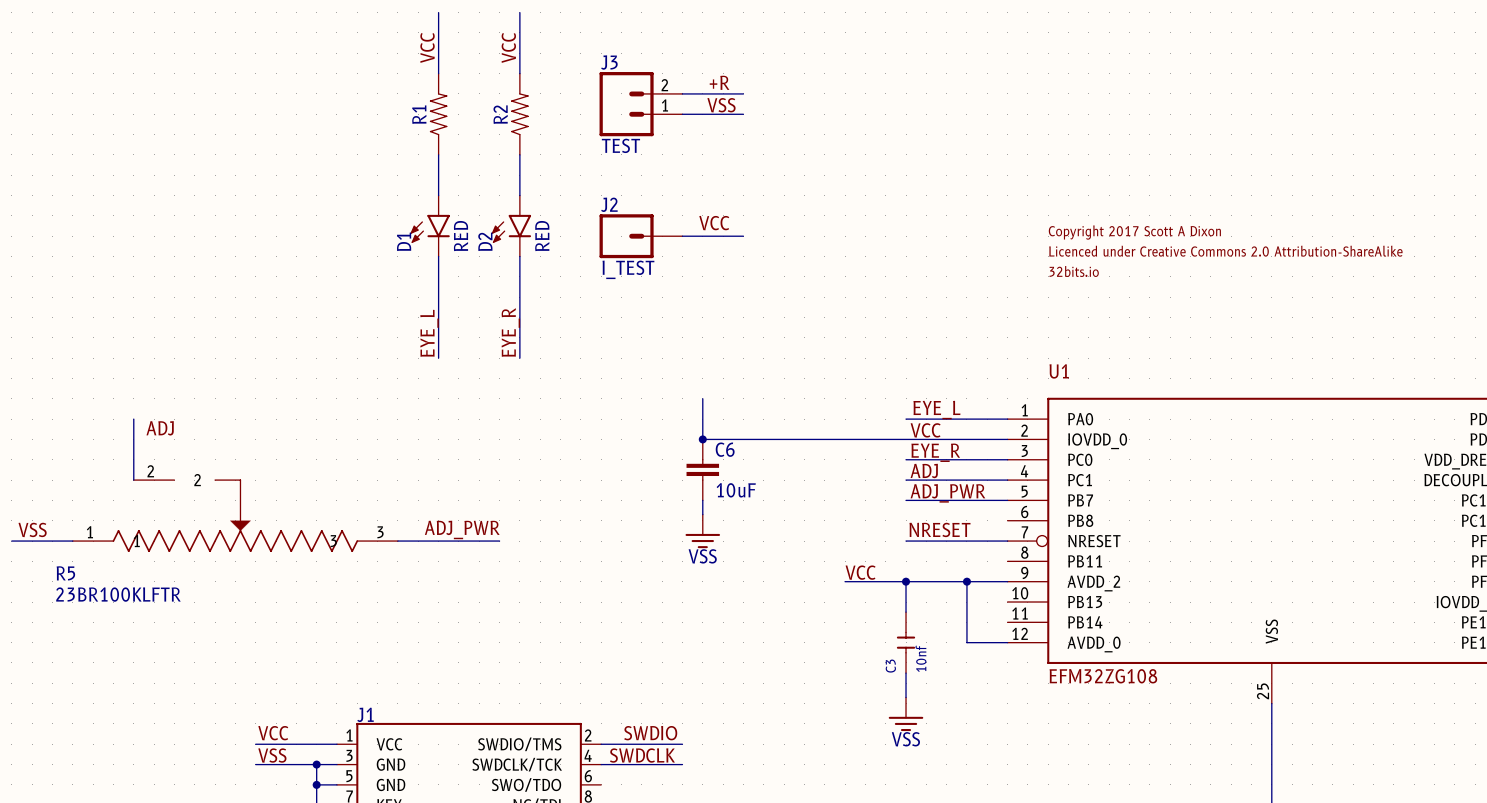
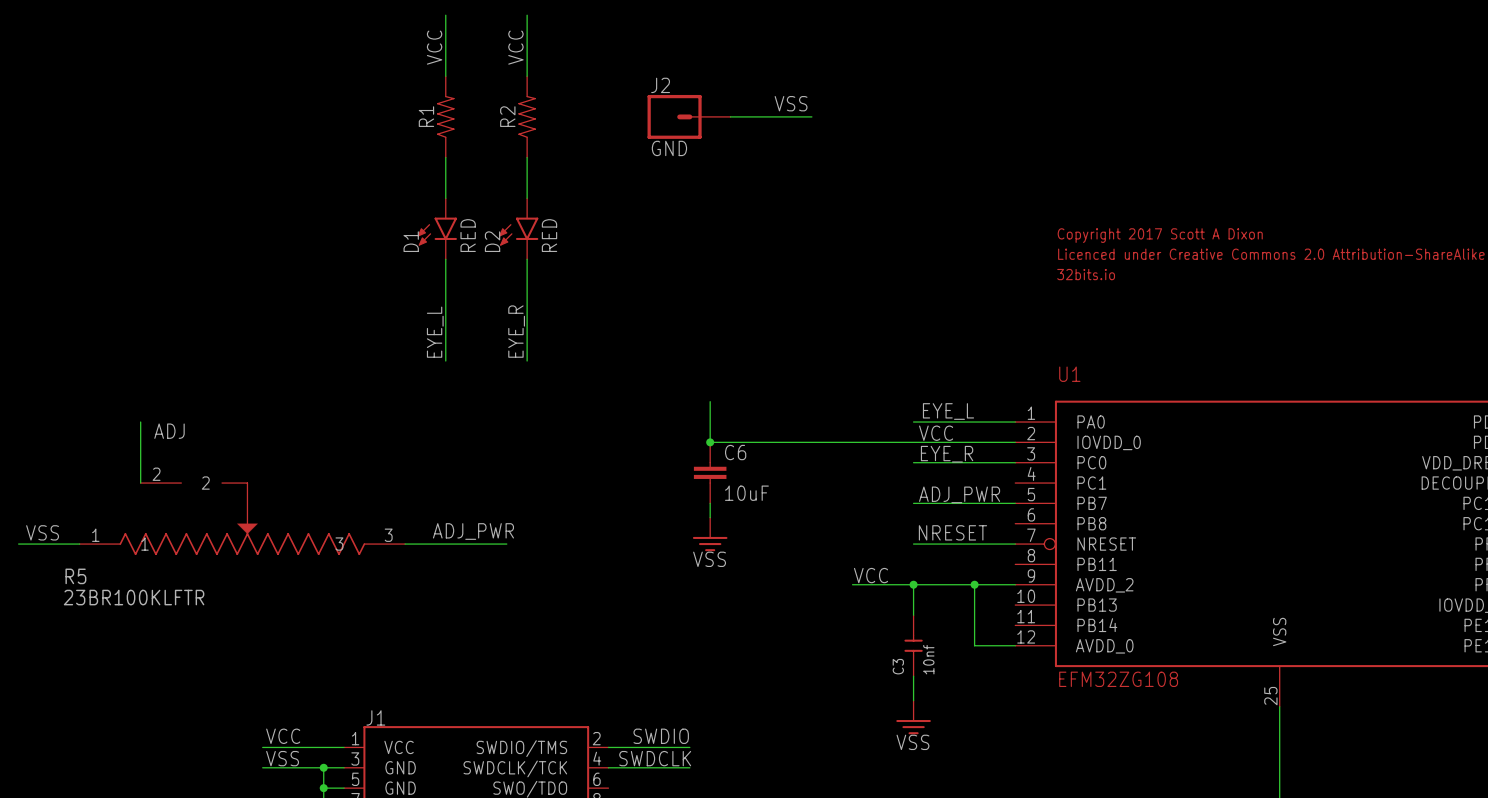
label: +R (719, 82) -> none
wire: (682, 93) (743, 93) -> (750, 116) (811, 116)
J3: TEST (641, 104) -> none
label position: VSS (721, 105) -> VSS (791, 103)
label: VCC (714, 223) -> none
J2 position: (641, 236) -> (689, 116)
wire: (682, 236) (743, 236) -> none
J2 value: I_TEST (628, 269) -> GND (669, 148)
label: ADJ (924, 471) -> none
wire: (906, 480) (1007, 480) -> none

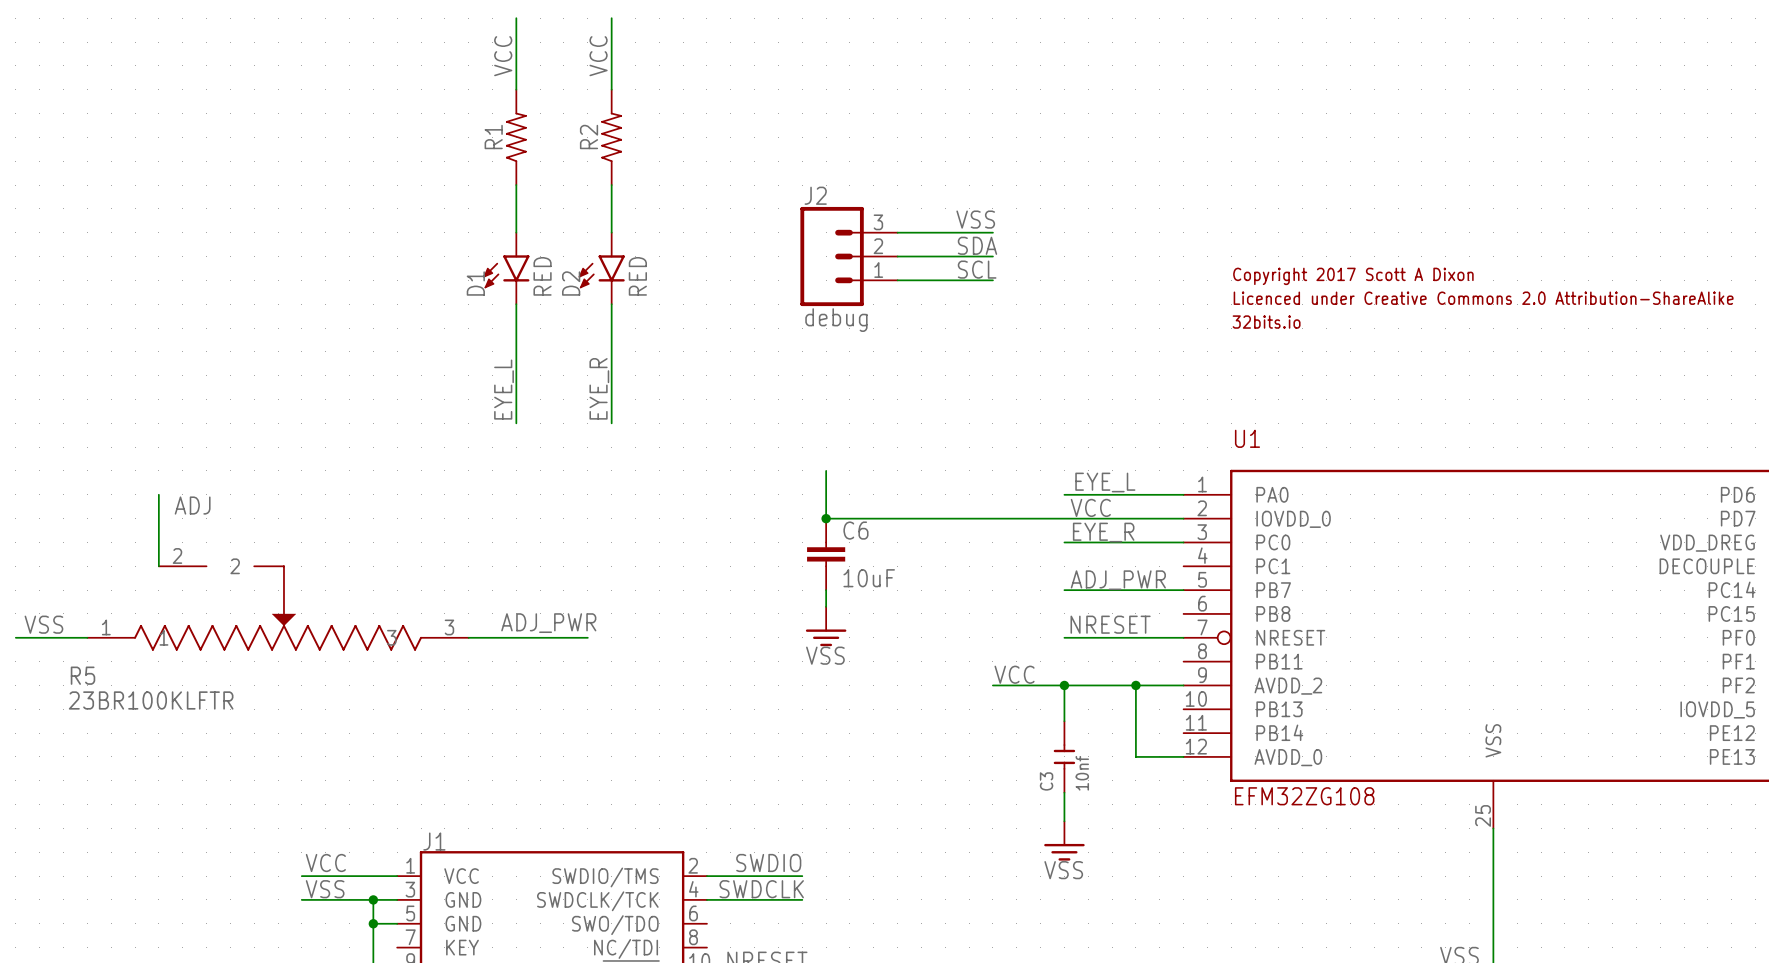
J2 name position: J2 (660, 85) -> J2 (815, 195)
J2 symbol: [647, 94, 731, 139] -> [800, 206, 898, 307]
label position: VSS (791, 103) -> VSS (975, 219)
wire: (730, 116) (811, 116) -> (897, 232) (992, 232)
J2 value: GND (669, 148) -> debug (836, 320)
label: none -> SDA (977, 245)
wire: none -> (897, 256) (992, 256)
label: none -> SCL (977, 269)
wire: none -> (897, 280) (992, 280)

